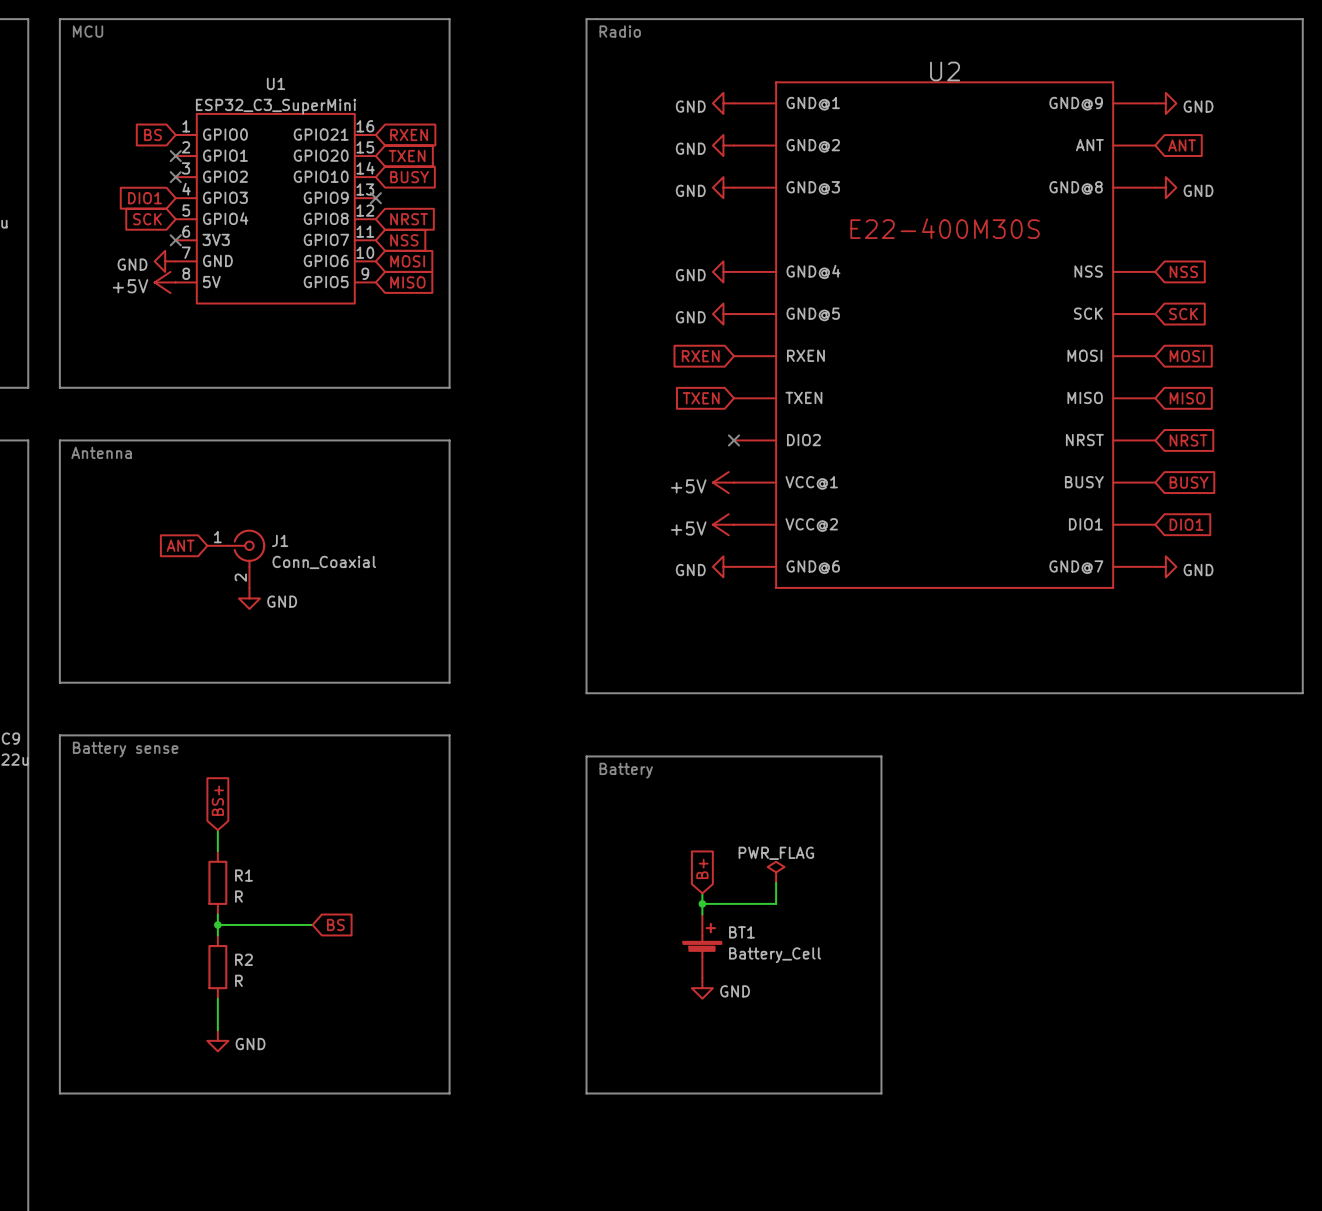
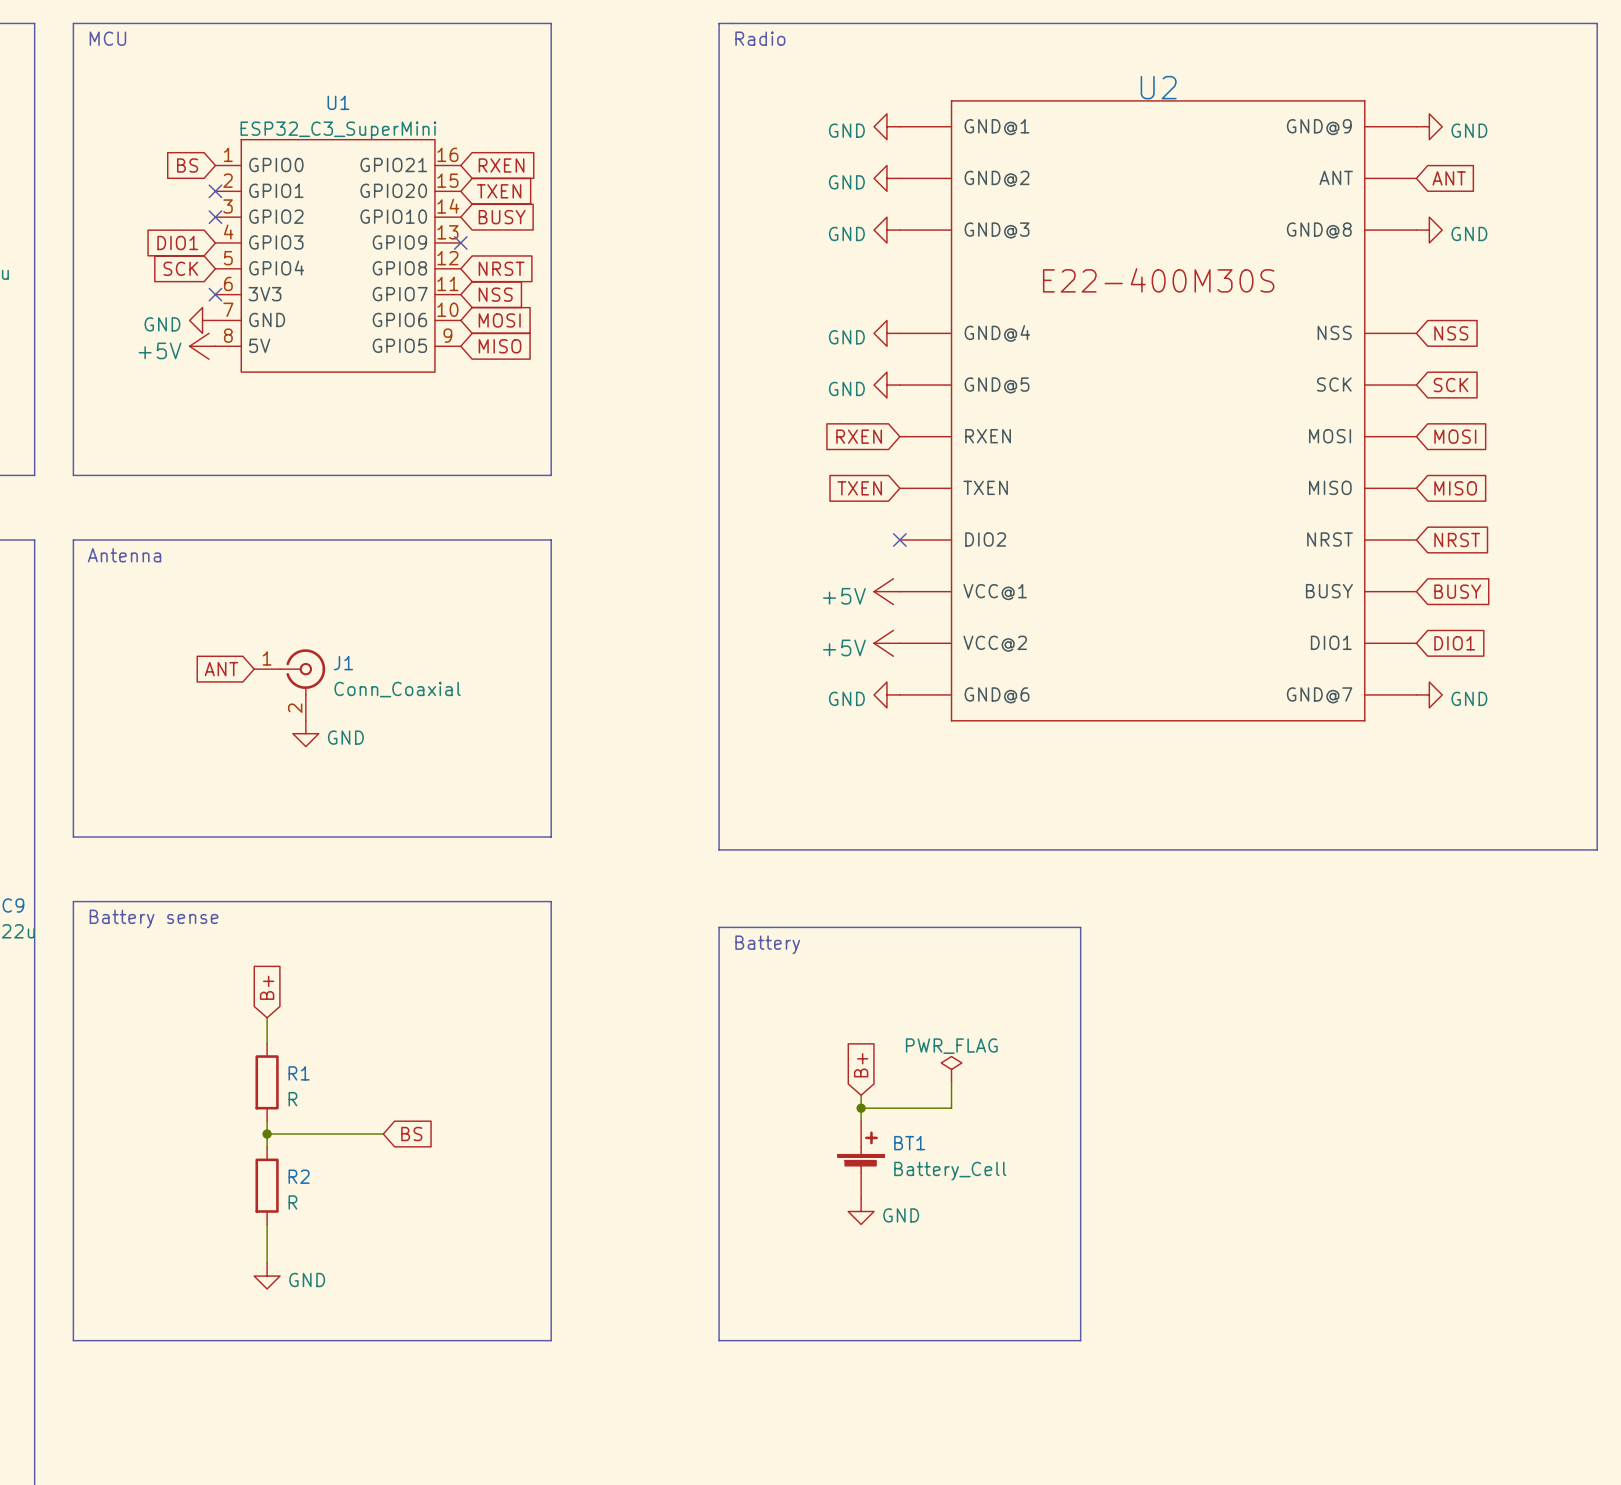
global label: BS+ (217, 800) -> B+ (267, 987)

